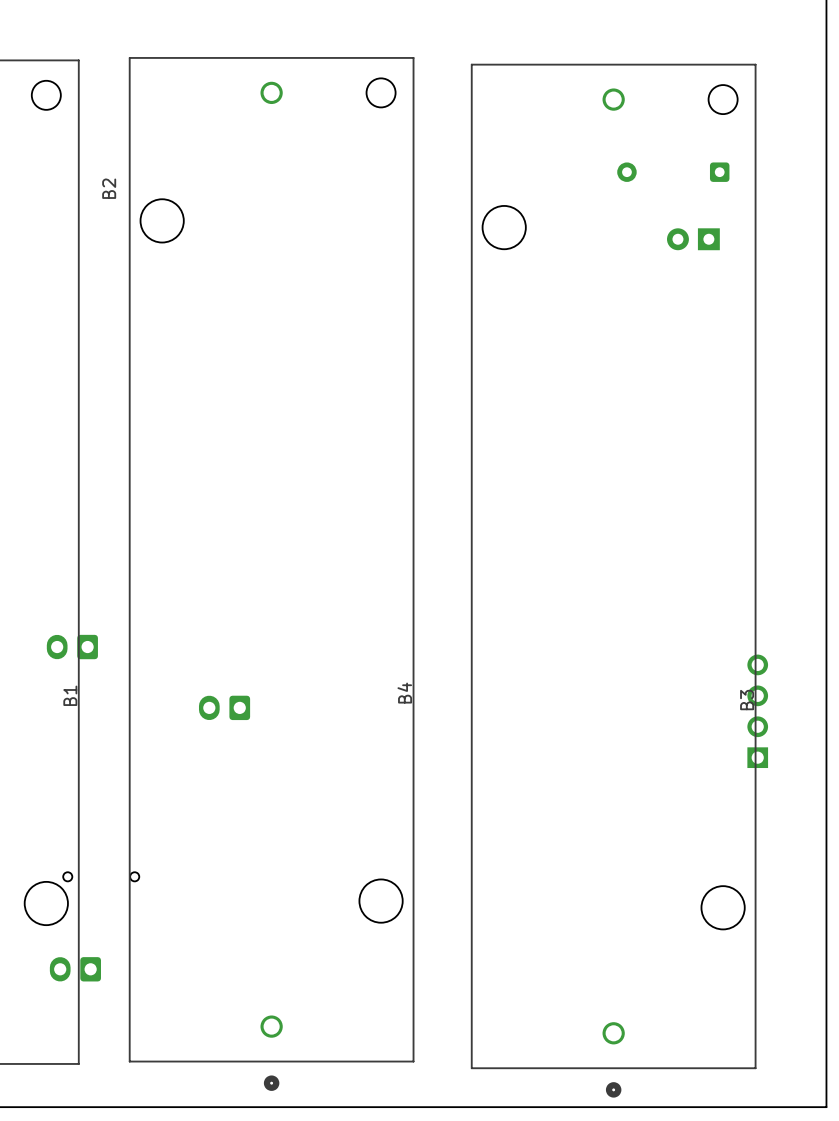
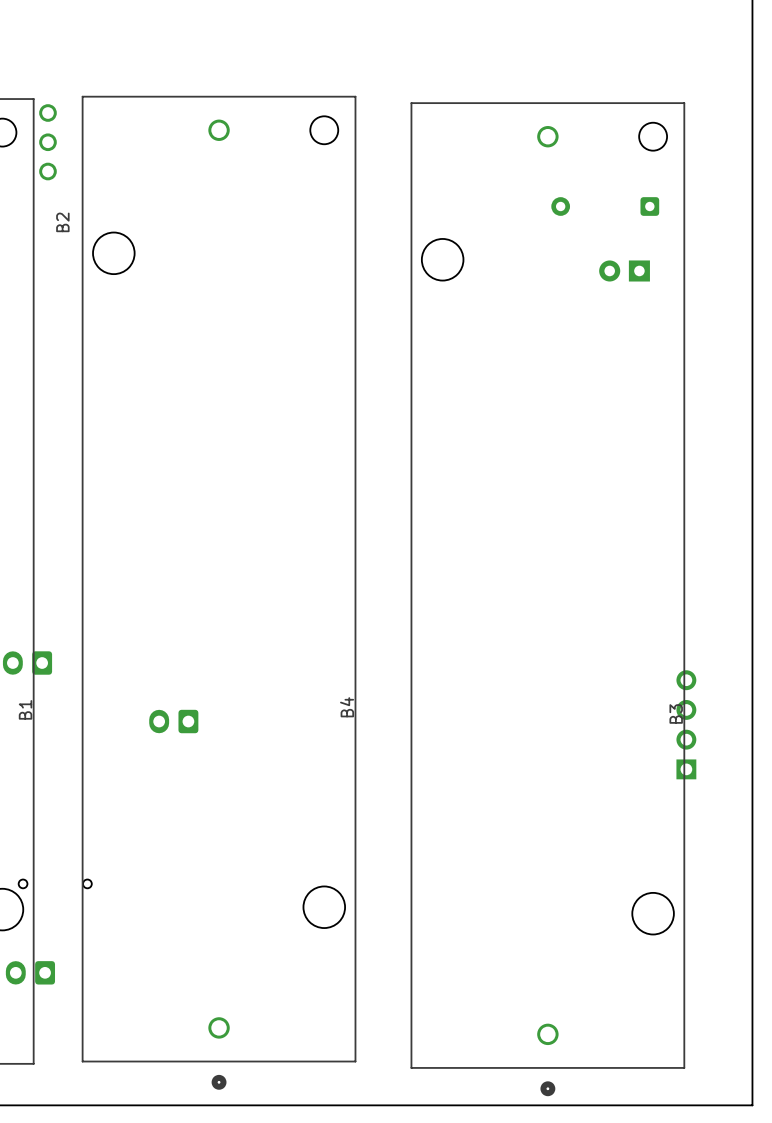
part: none -> (47, 142)

